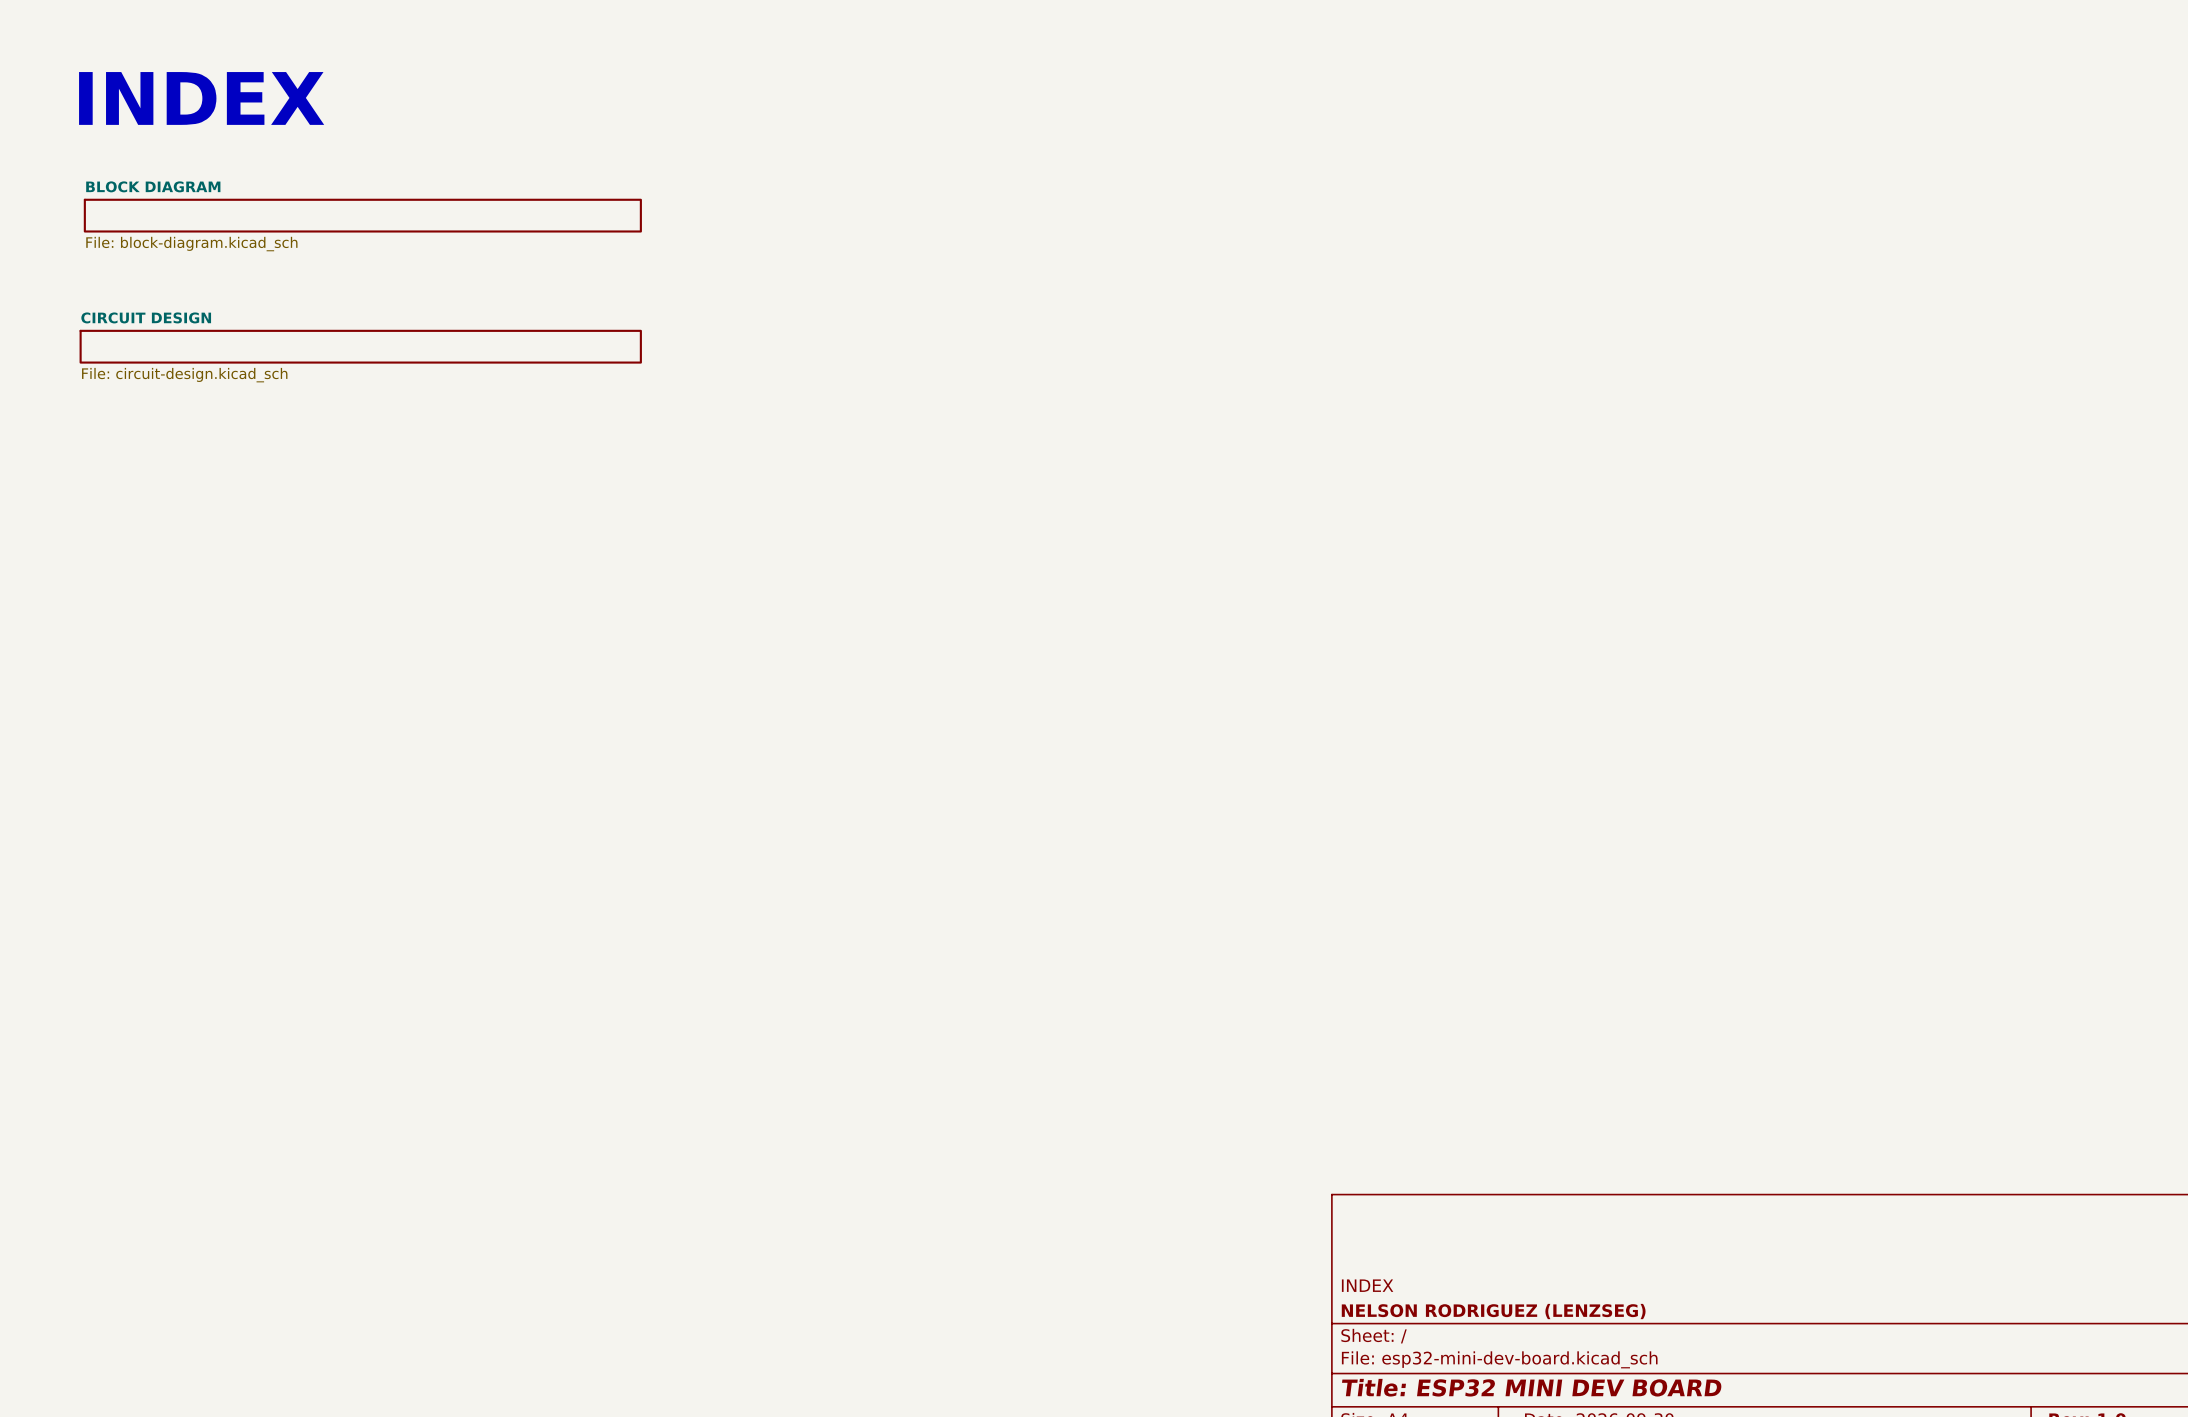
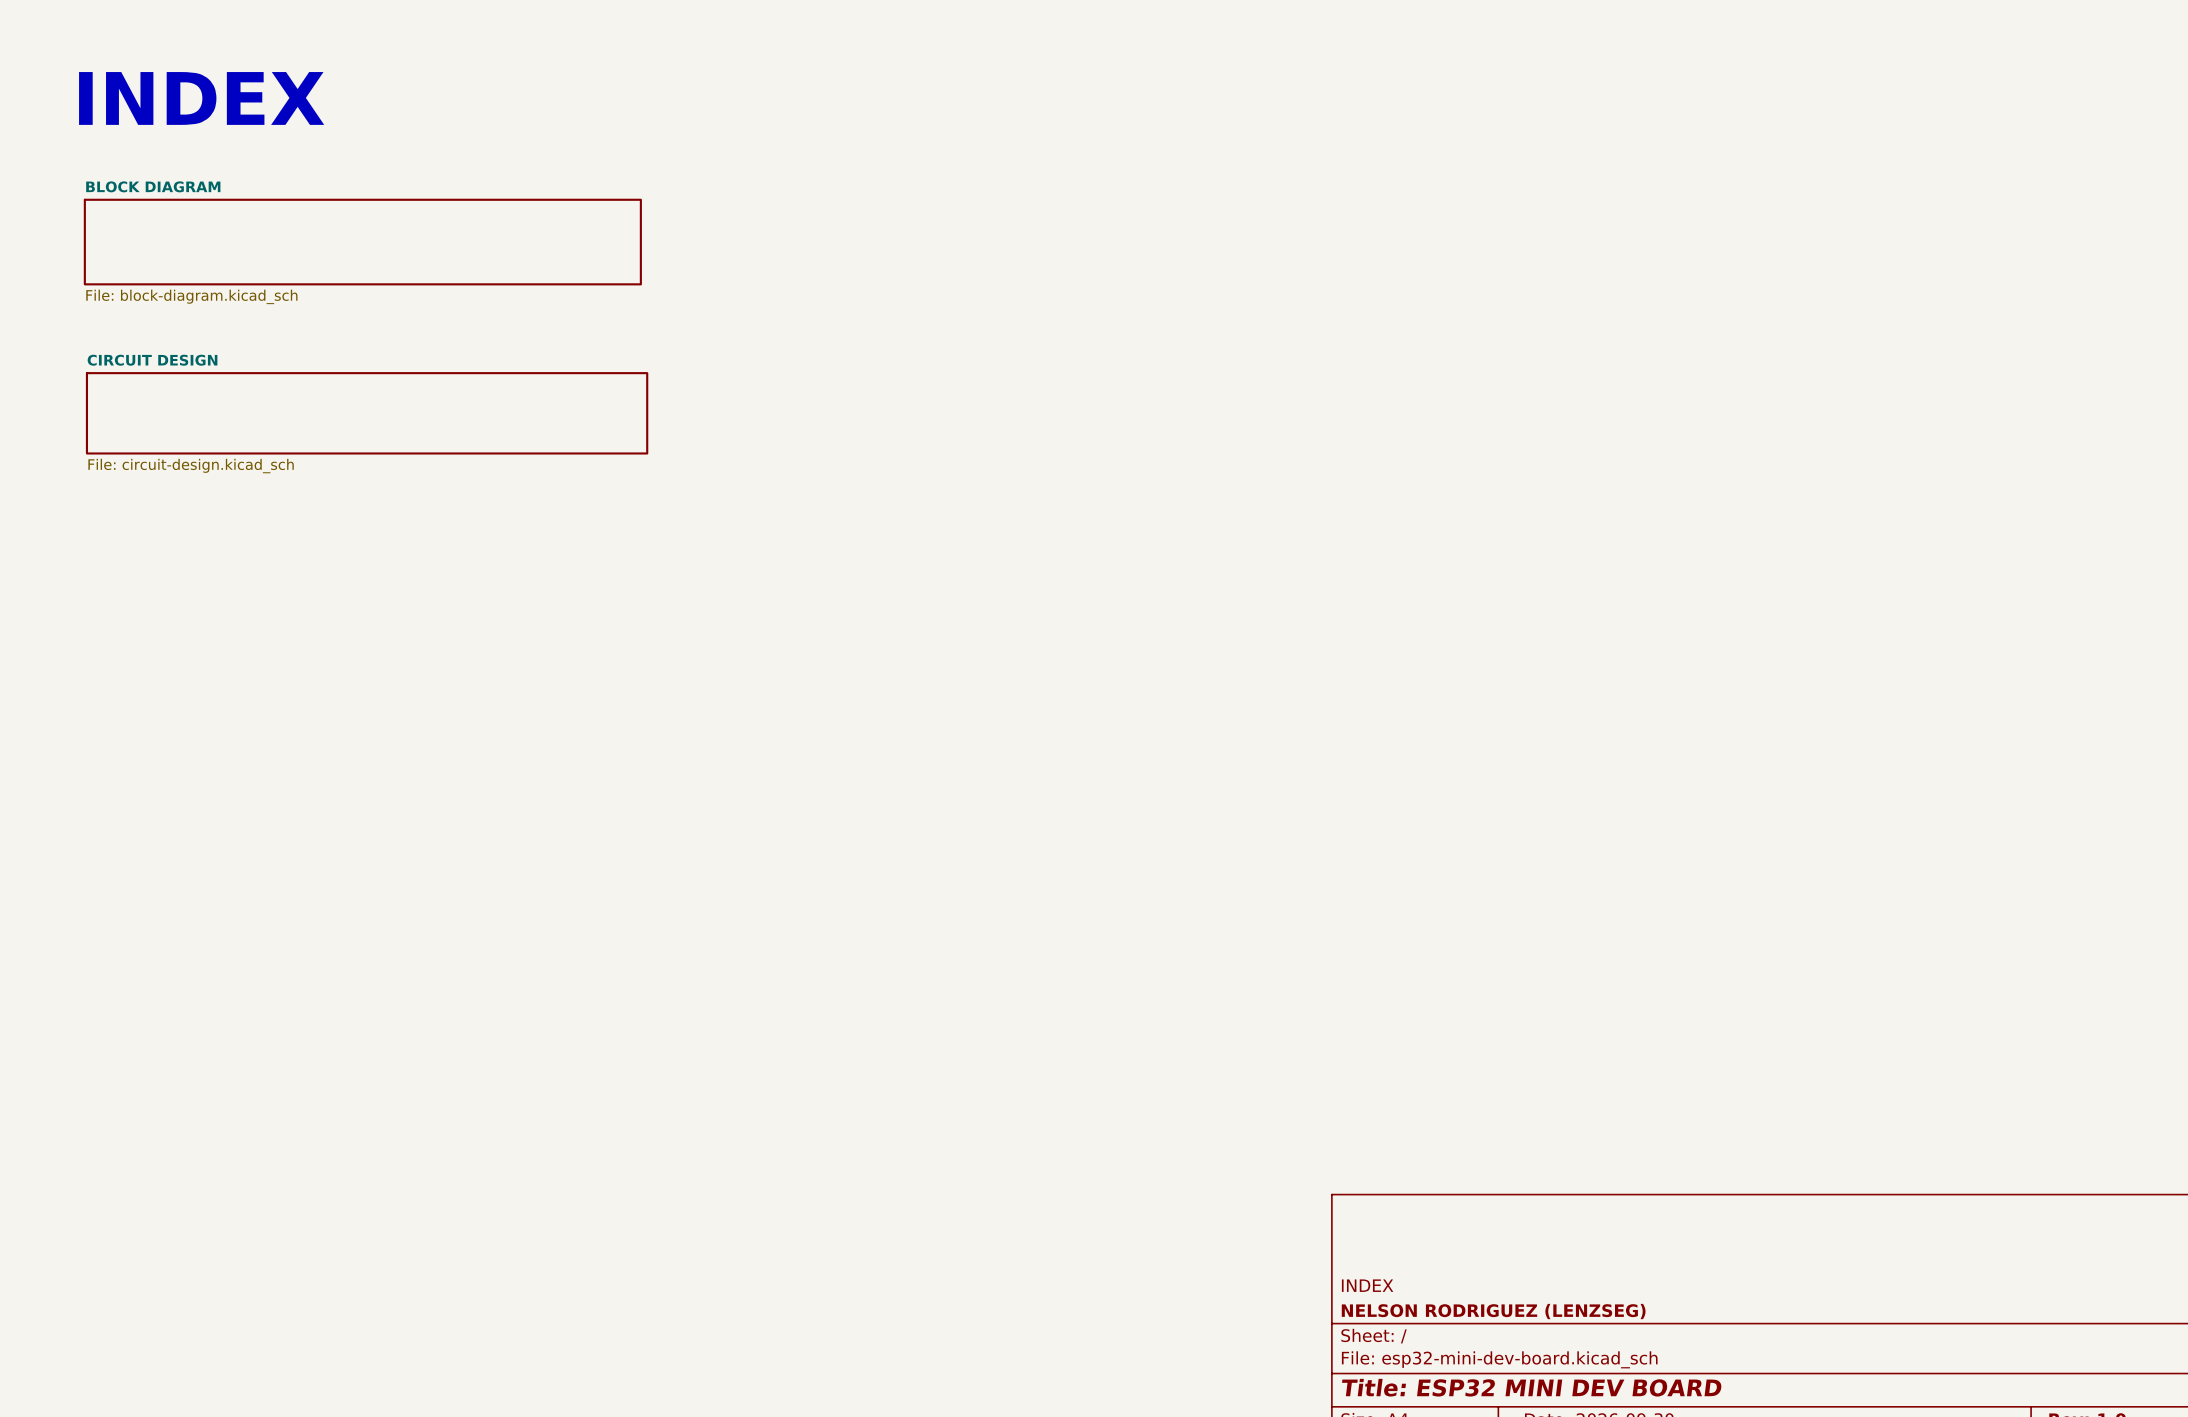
sheet BLOCK DIAGRAM: File: block-diagram.kicad_sch (362, 215) -> none
sheet BLOCK DIAGRAM: none -> File: block-diagram.kicad_sch (362, 242)
sheet CIRCUIT DESIGN: File: circuit-design.kicad_sch (360, 346) -> none
sheet CIRCUIT DESIGN: none -> File: circuit-design.kicad_sch (367, 413)

